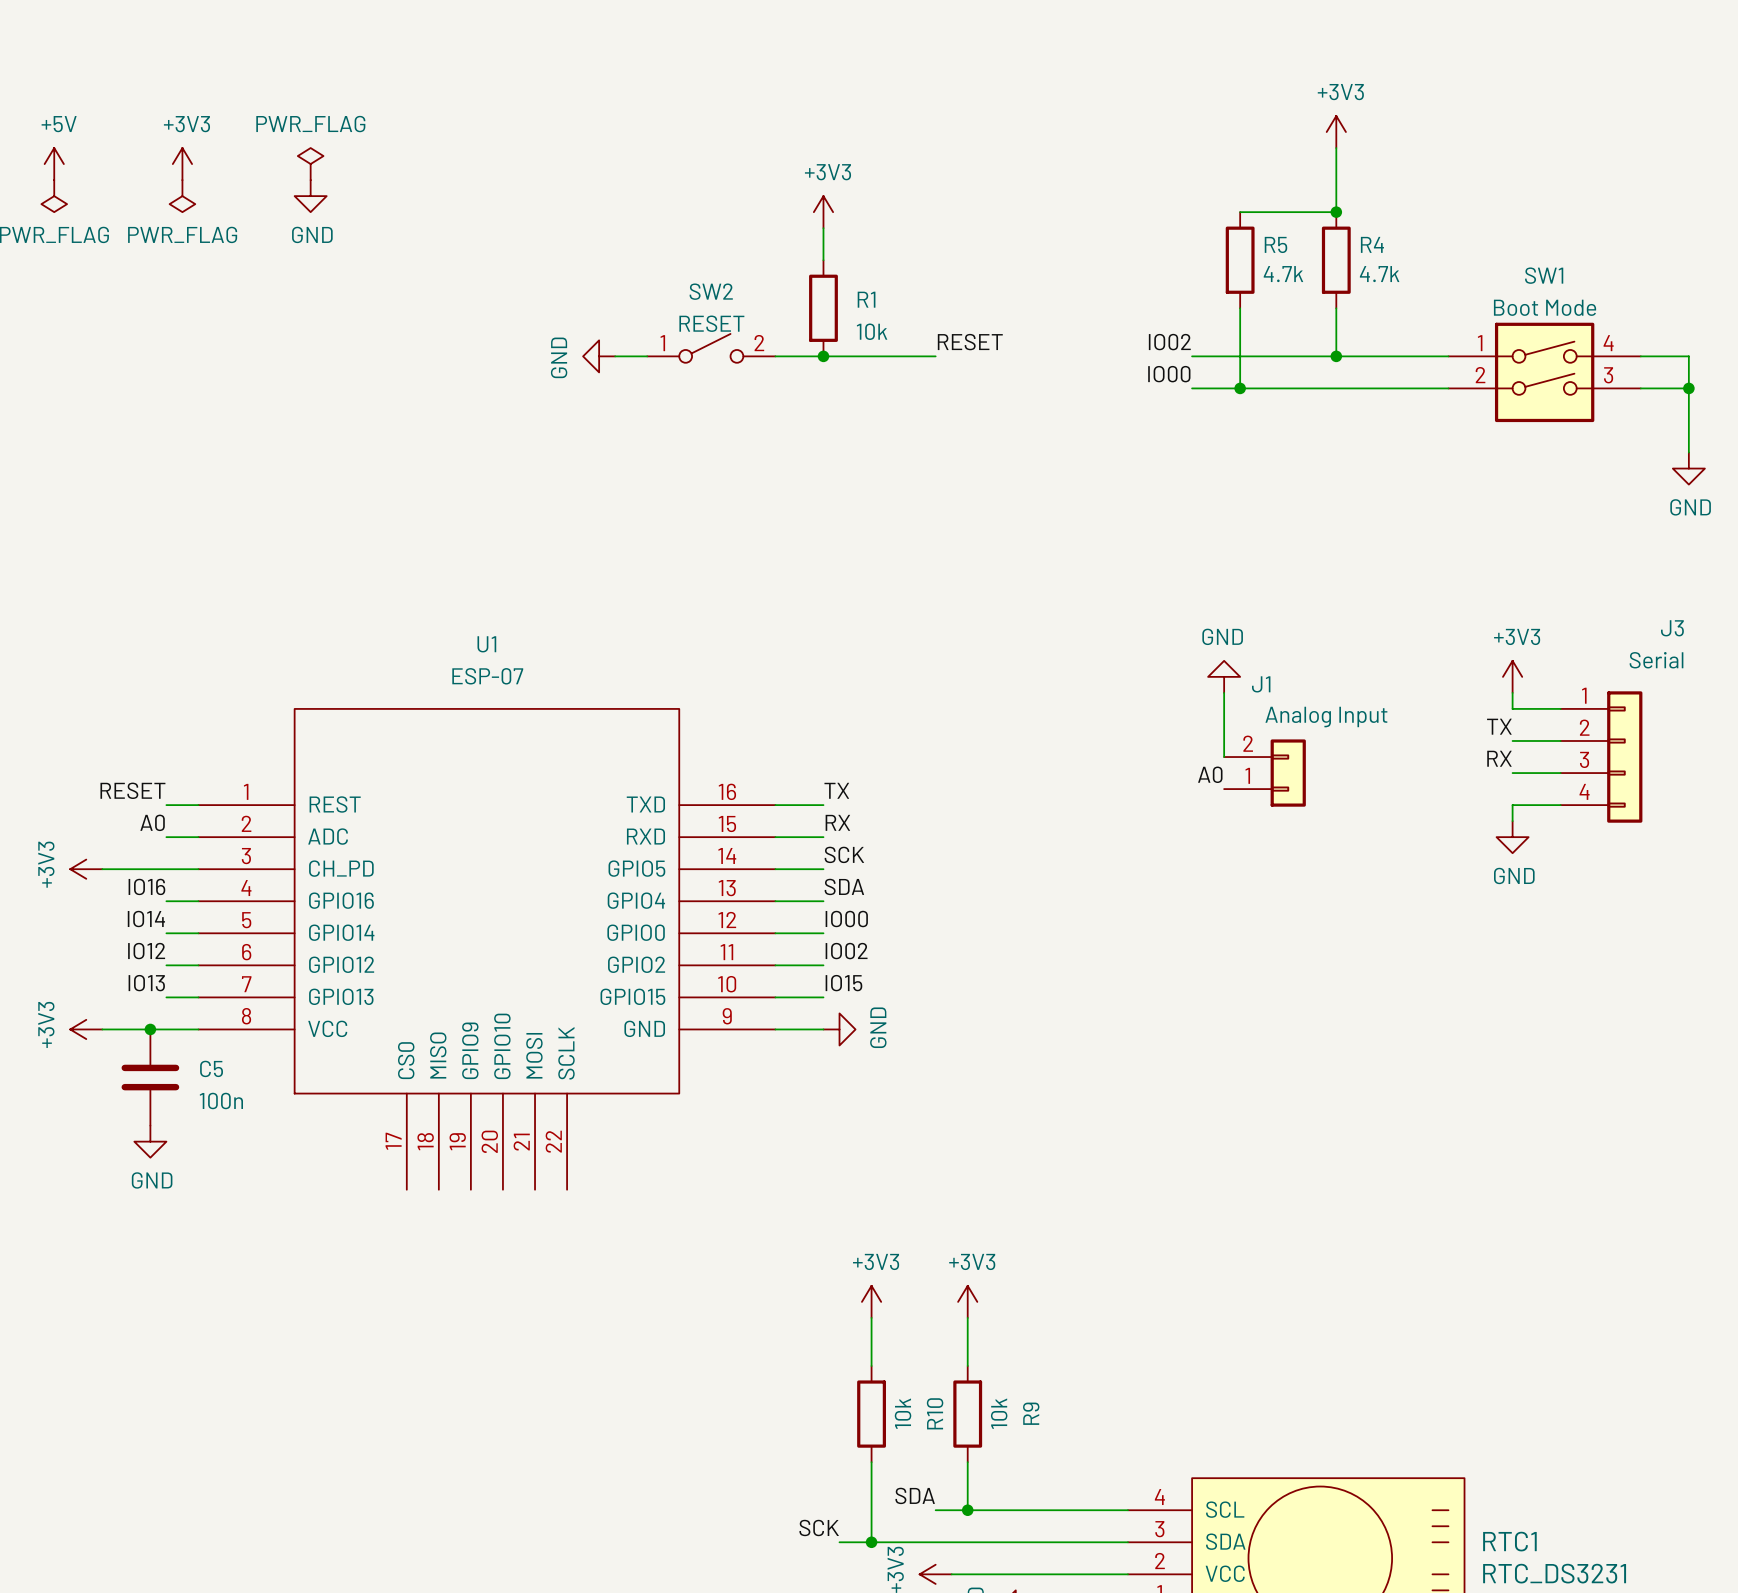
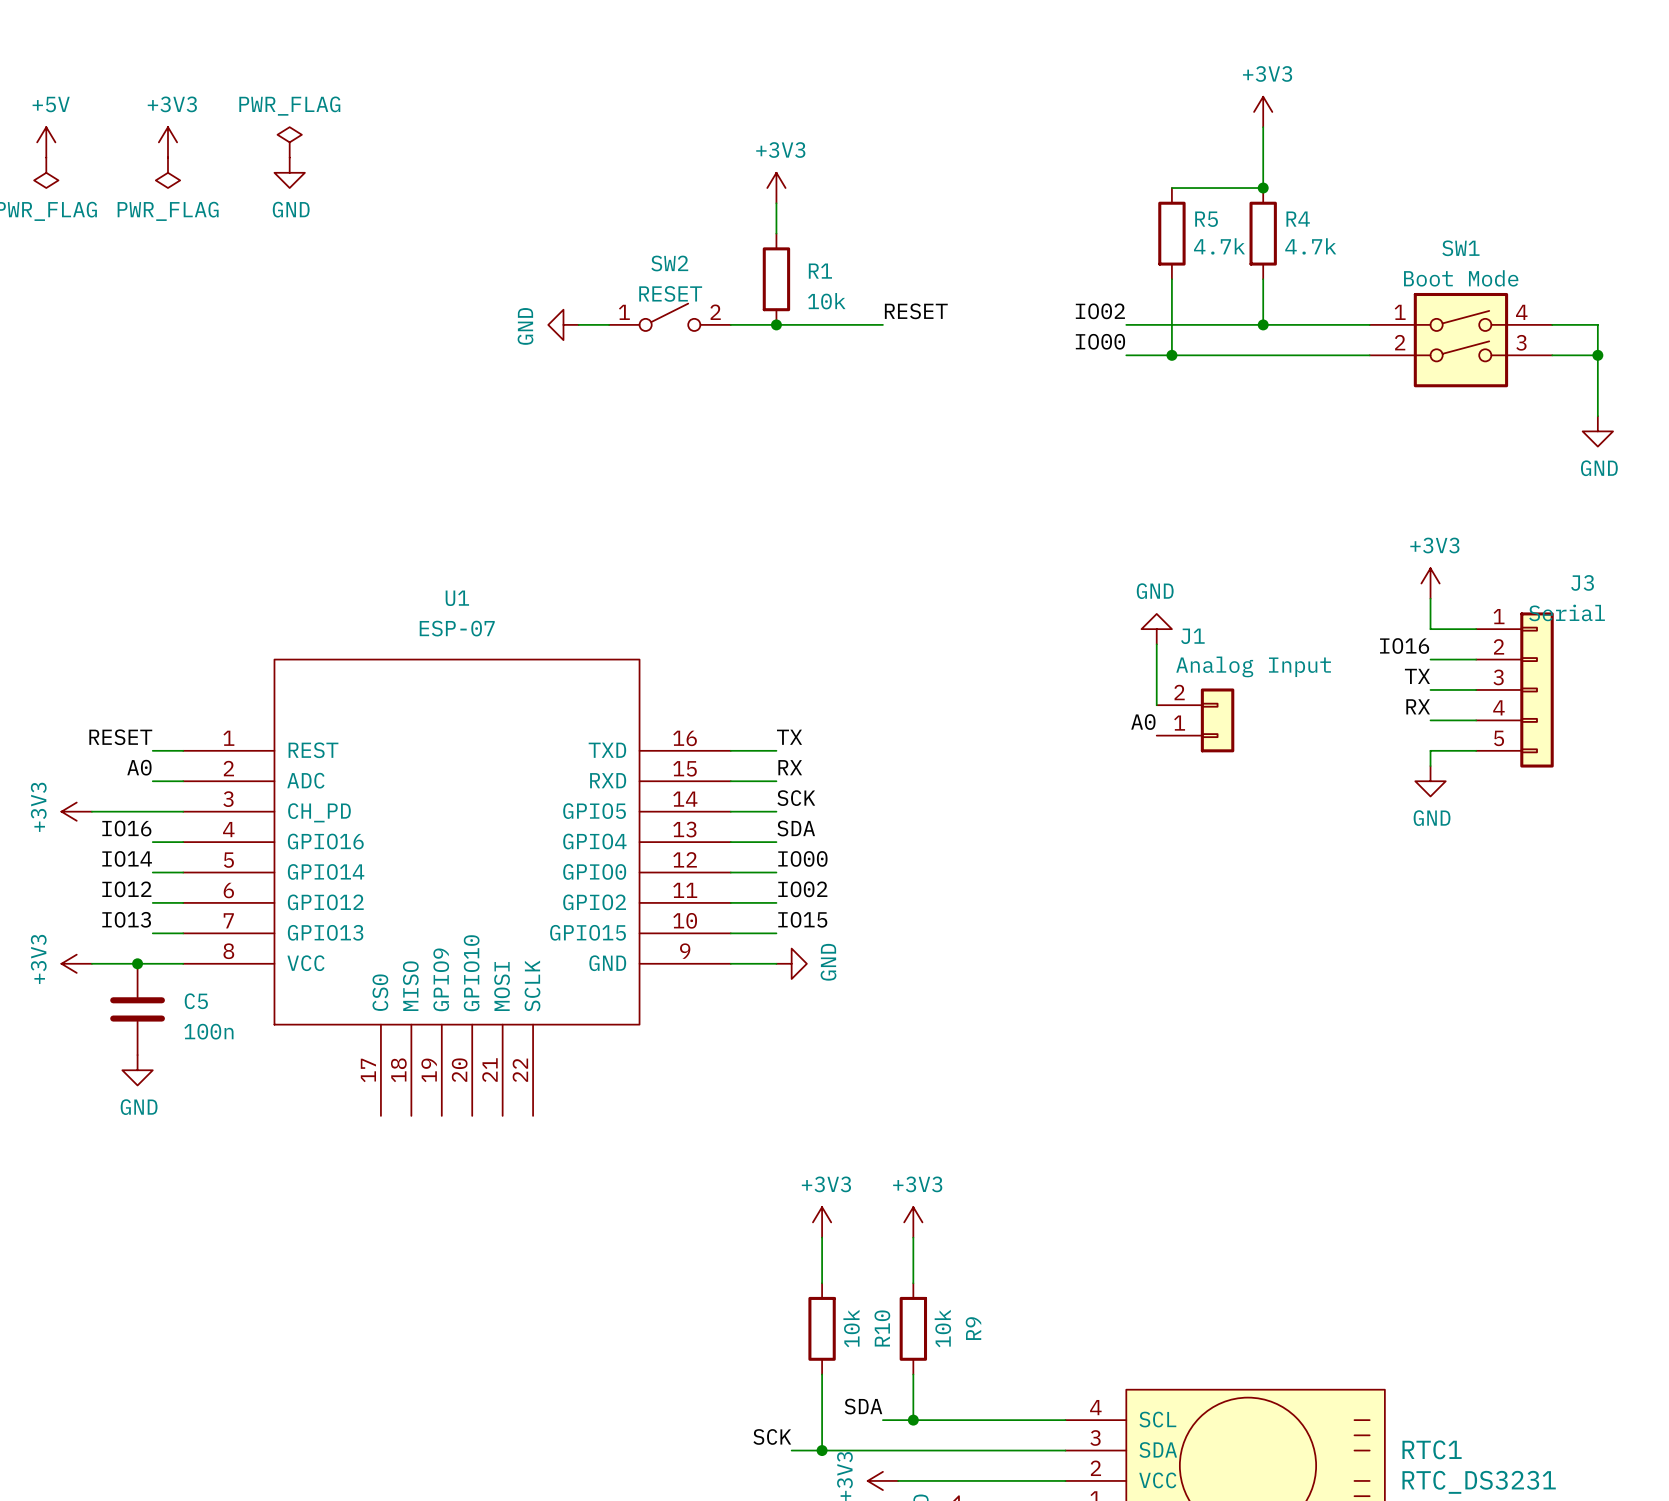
wire: none -> (1430, 598) (1430, 629) (1476, 629)
power symbol position: +3V3 (1512, 676) -> +3V3 (1430, 583)
J3 symbol: [1560, 691, 1643, 823] -> [1476, 612, 1554, 768]
wire: (1512, 692) (1512, 708) -> none
label: none -> IO16 (1404, 645)

